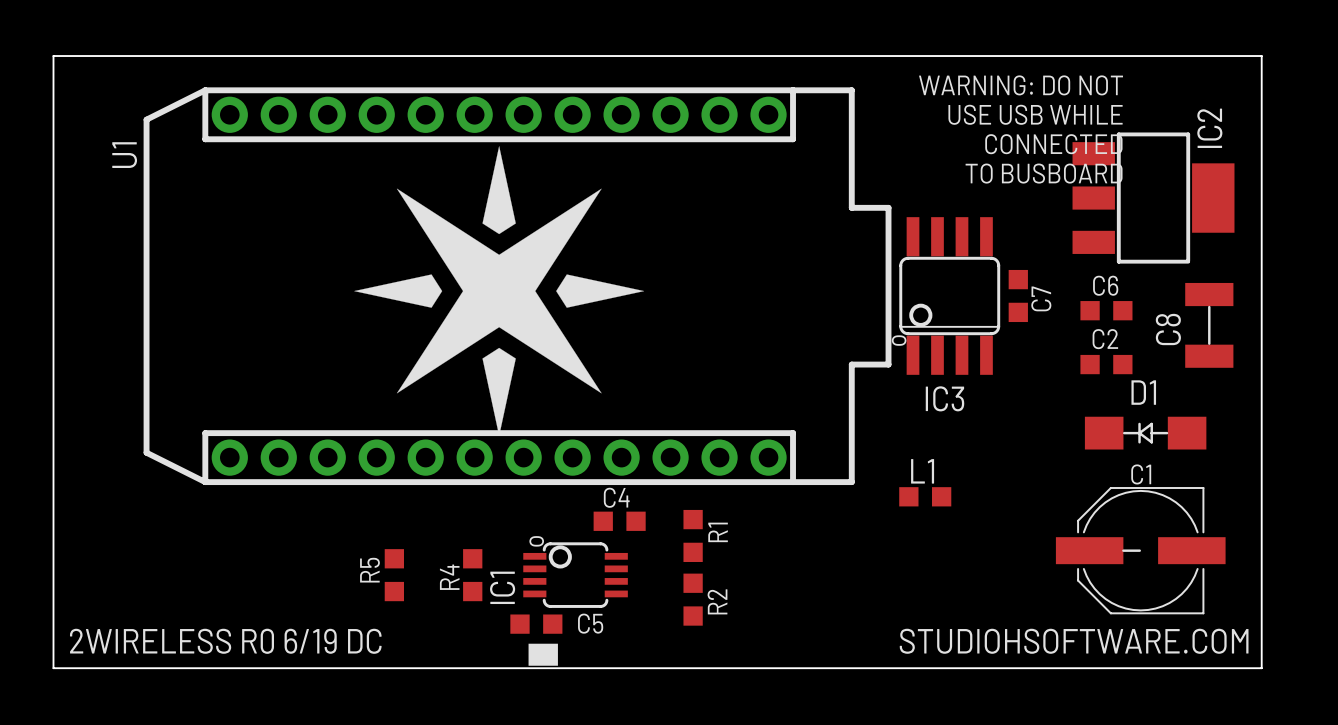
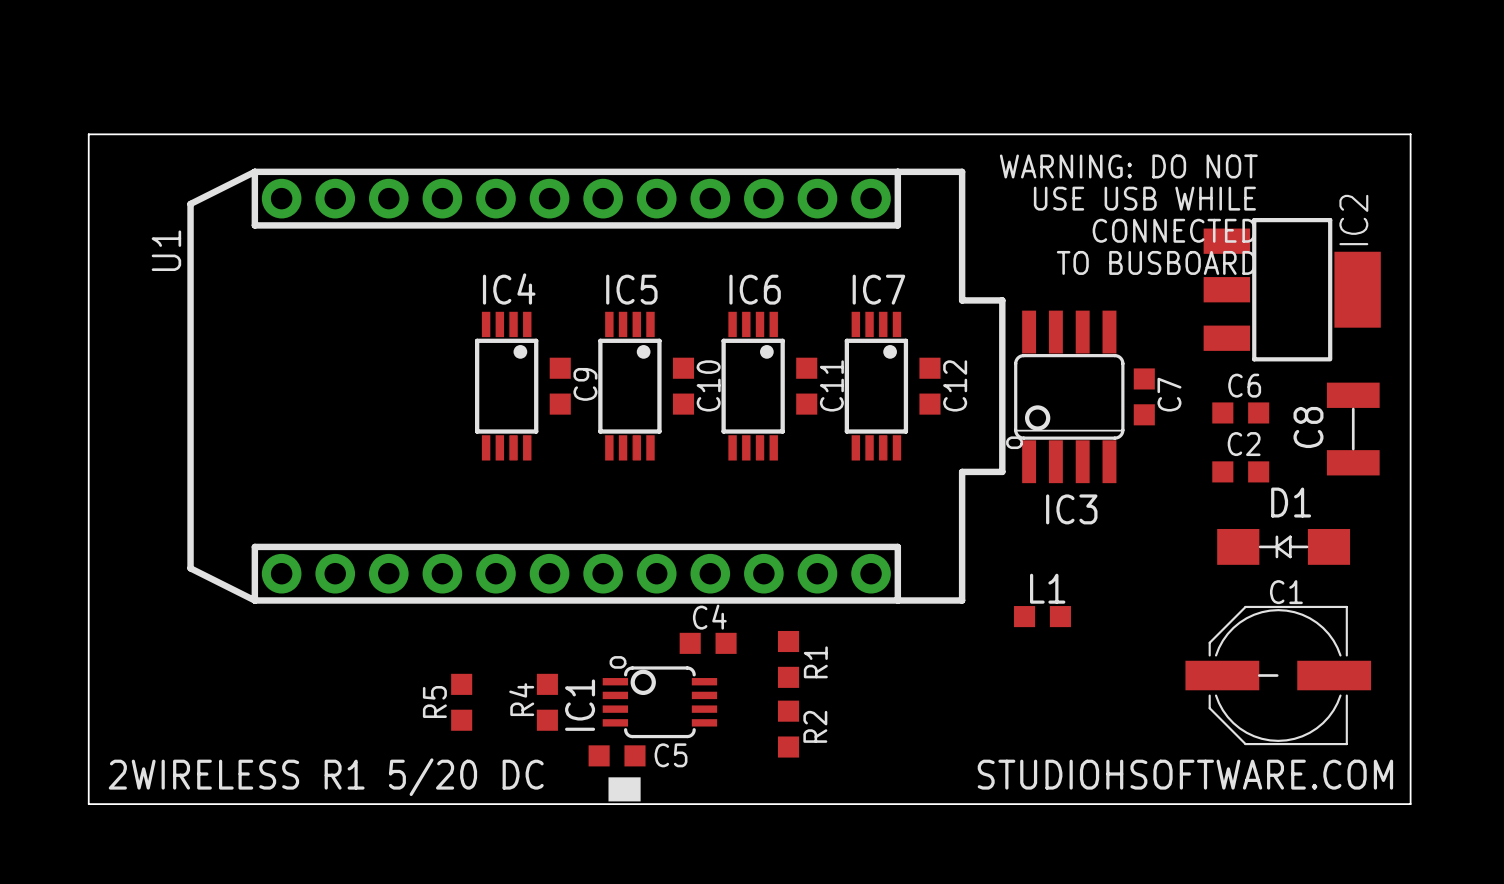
drawing: [354, 146, 645, 436] -> none
IC4: none -> (506, 386)
C9: none -> (560, 386)
IC5: none -> (629, 386)
C10: none -> (683, 386)
IC6: none -> (753, 386)
C11: none -> (806, 386)
IC7: none -> (876, 386)
C12: none -> (929, 386)
text: 2WIRELESS R0 6/19 DC (225, 641) -> 2WIRELESS R1 5/20 DC (326, 777)

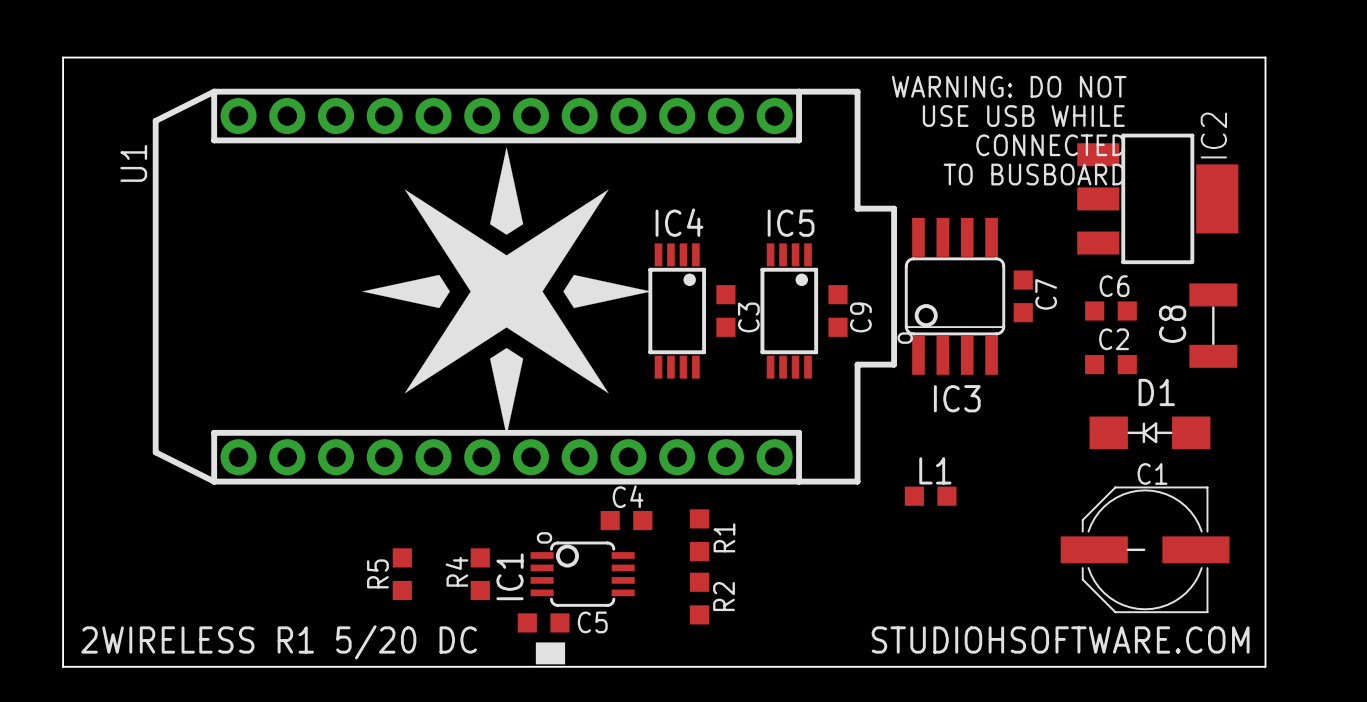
drawing: none -> [362, 147, 651, 436]
C9 name position: C9 (585, 384) -> C9 (860, 317)
IC4 position: (506, 386) -> (677, 310)
C9 position: (560, 386) -> (838, 310)
IC5 position: (629, 386) -> (789, 310)
C10: (683, 386) -> none
IC6: (753, 386) -> none
C11: (806, 386) -> none
IC7: (876, 386) -> none
C12: (929, 386) -> none
C3: none -> (725, 310)

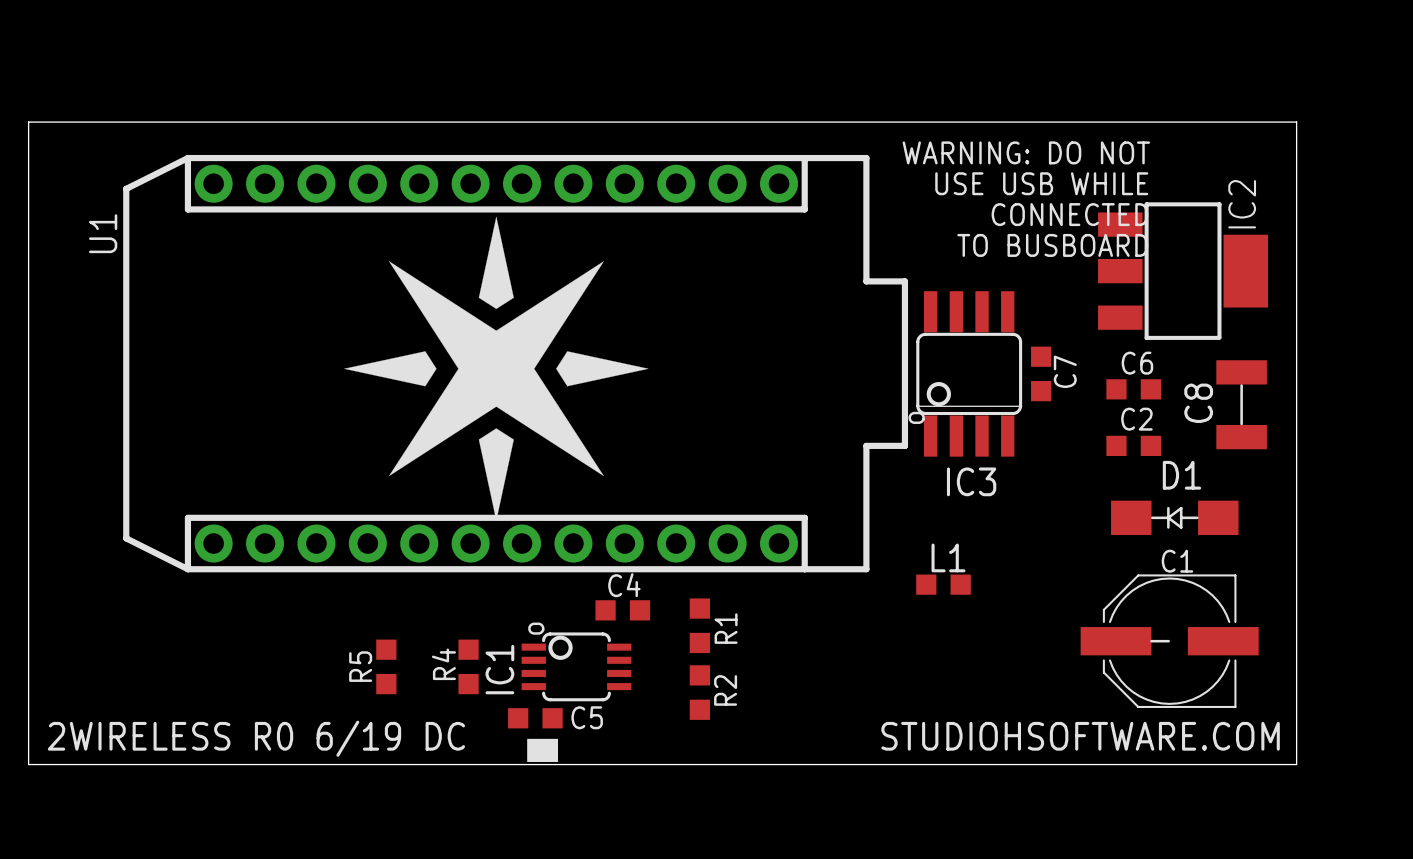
IC4: (677, 310) -> none
C3: (725, 310) -> none
IC5: (789, 310) -> none
C9: (838, 310) -> none
text: 2WIRELESS R1 5/20 DC (279, 642) -> 2WIRELESS R0 6/19 DC (256, 738)

